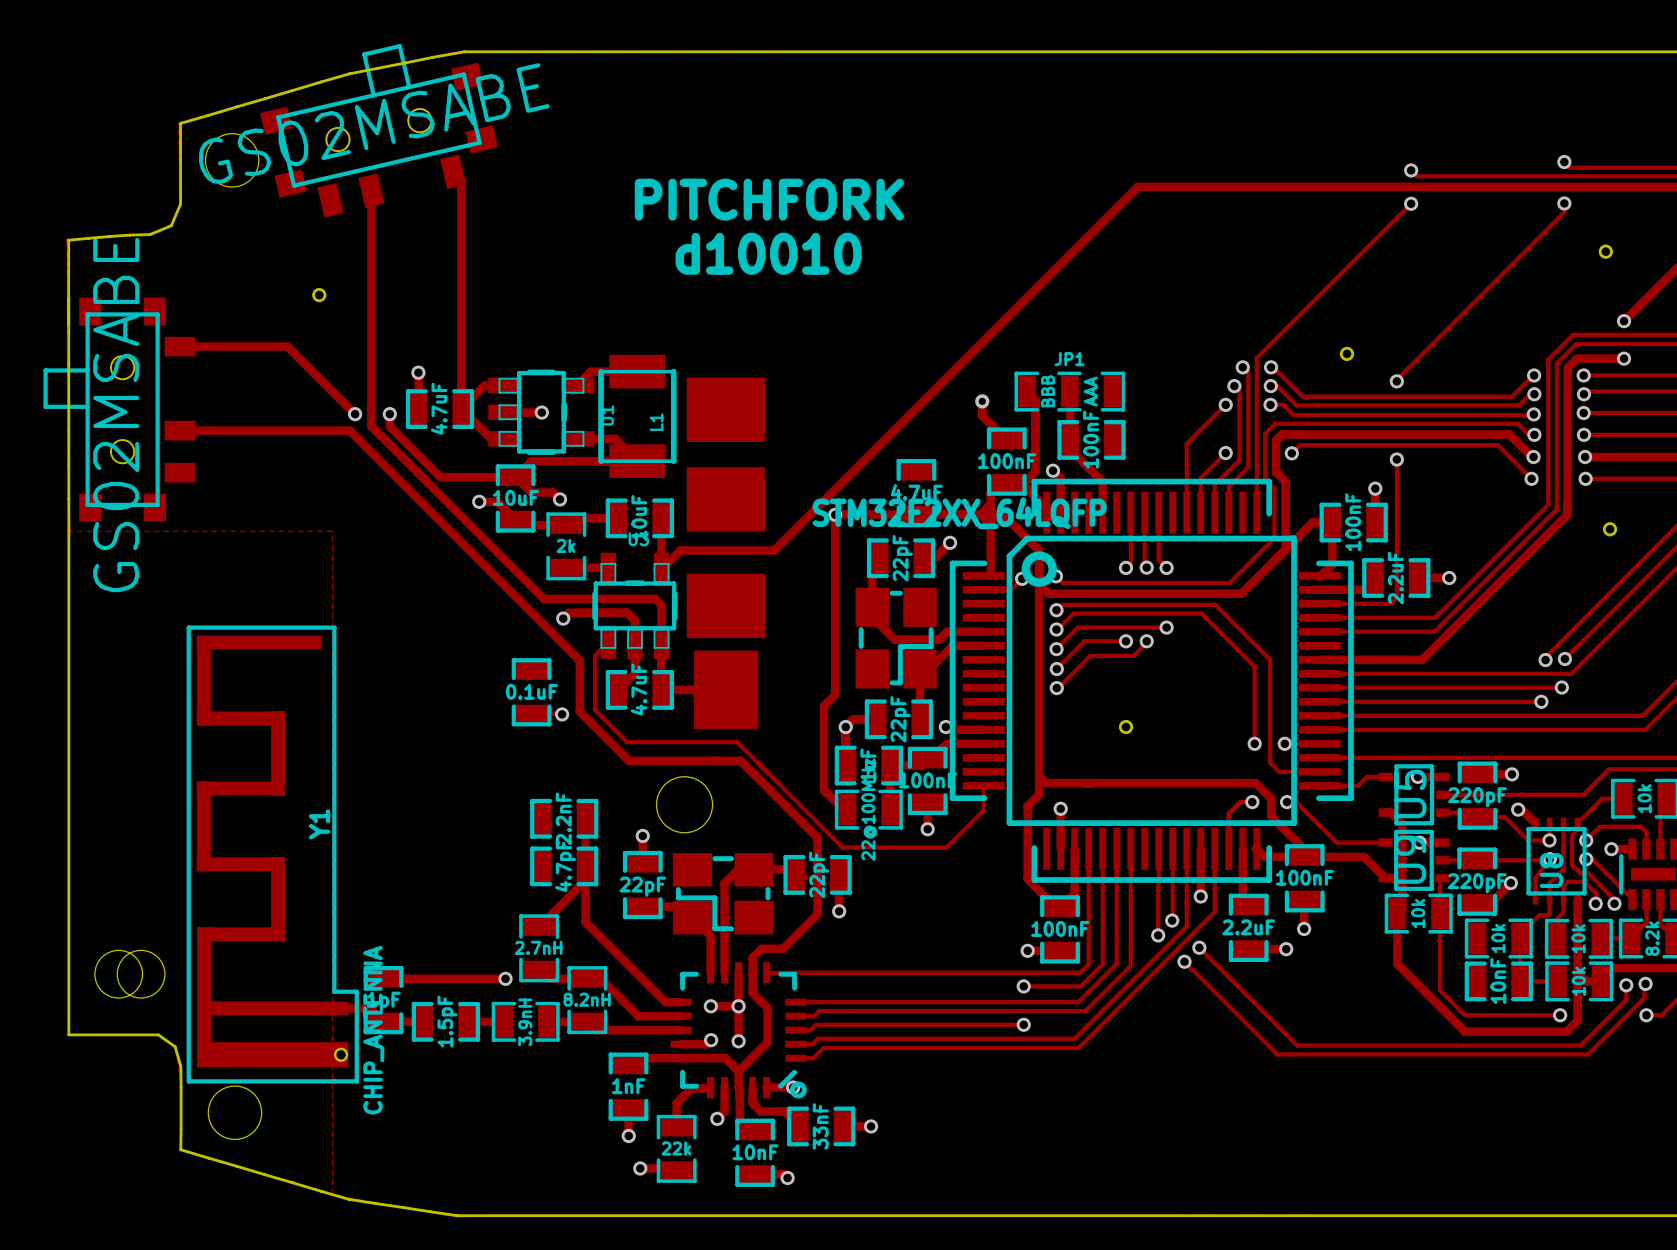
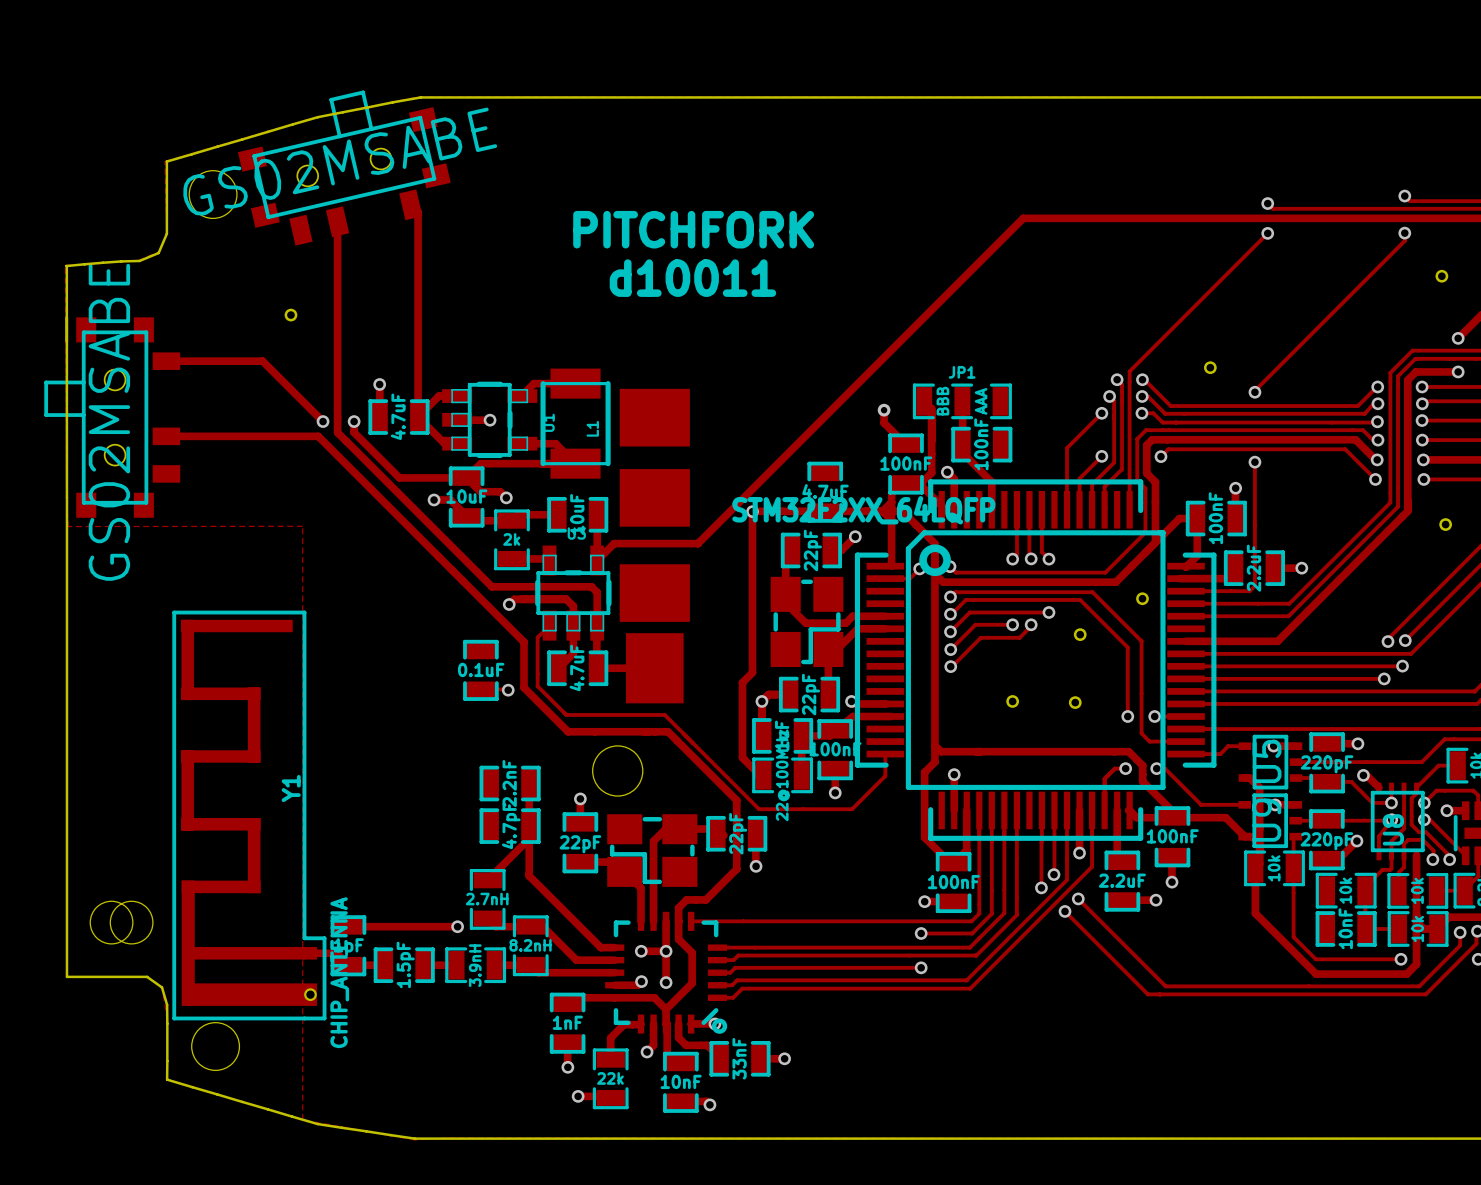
text: d10010 (768, 253) -> d10011 (692, 278)
part: none -> (1142, 598)
part: none -> (1080, 634)
part: none -> (1075, 702)

